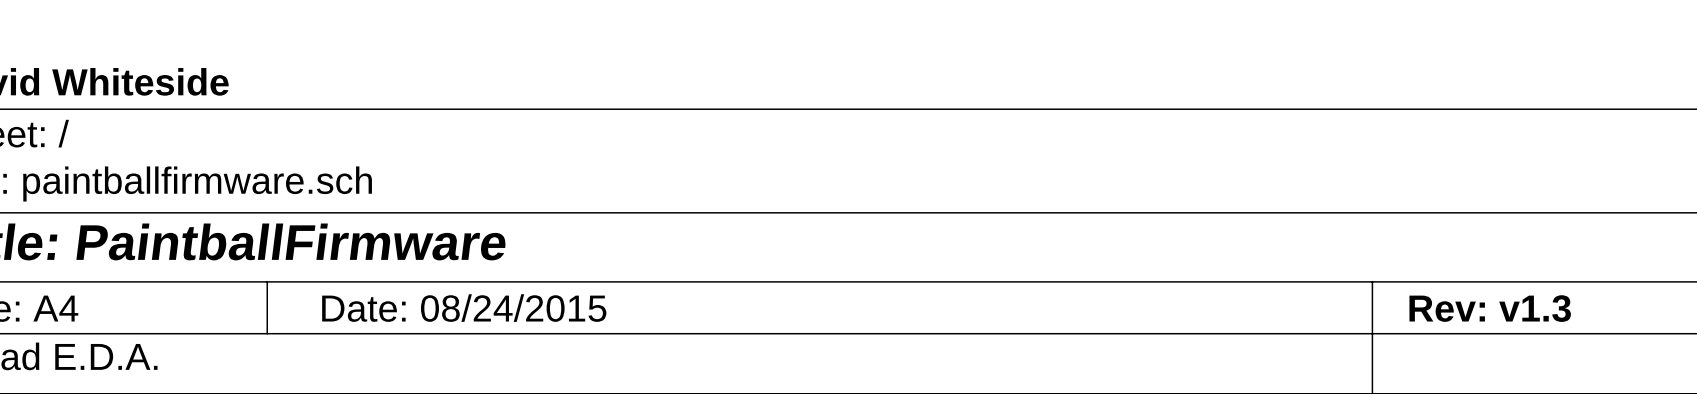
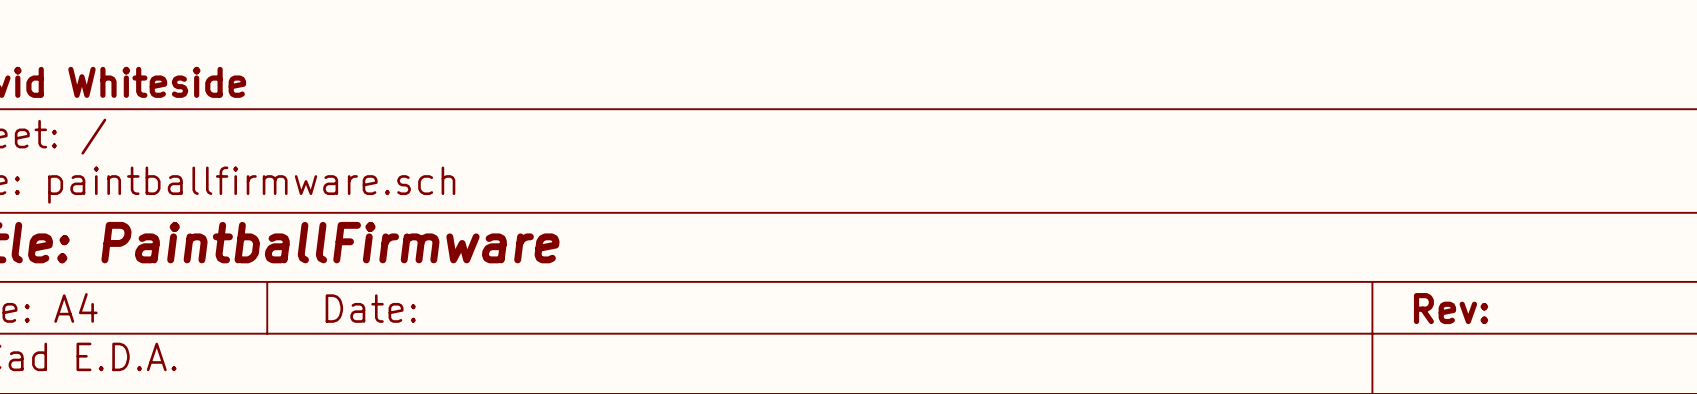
title block: Date: 08/24/2015 (464, 308) -> Date: (370, 308)
title block: Rev: v1.3 (1490, 308) -> Rev: (1451, 308)

